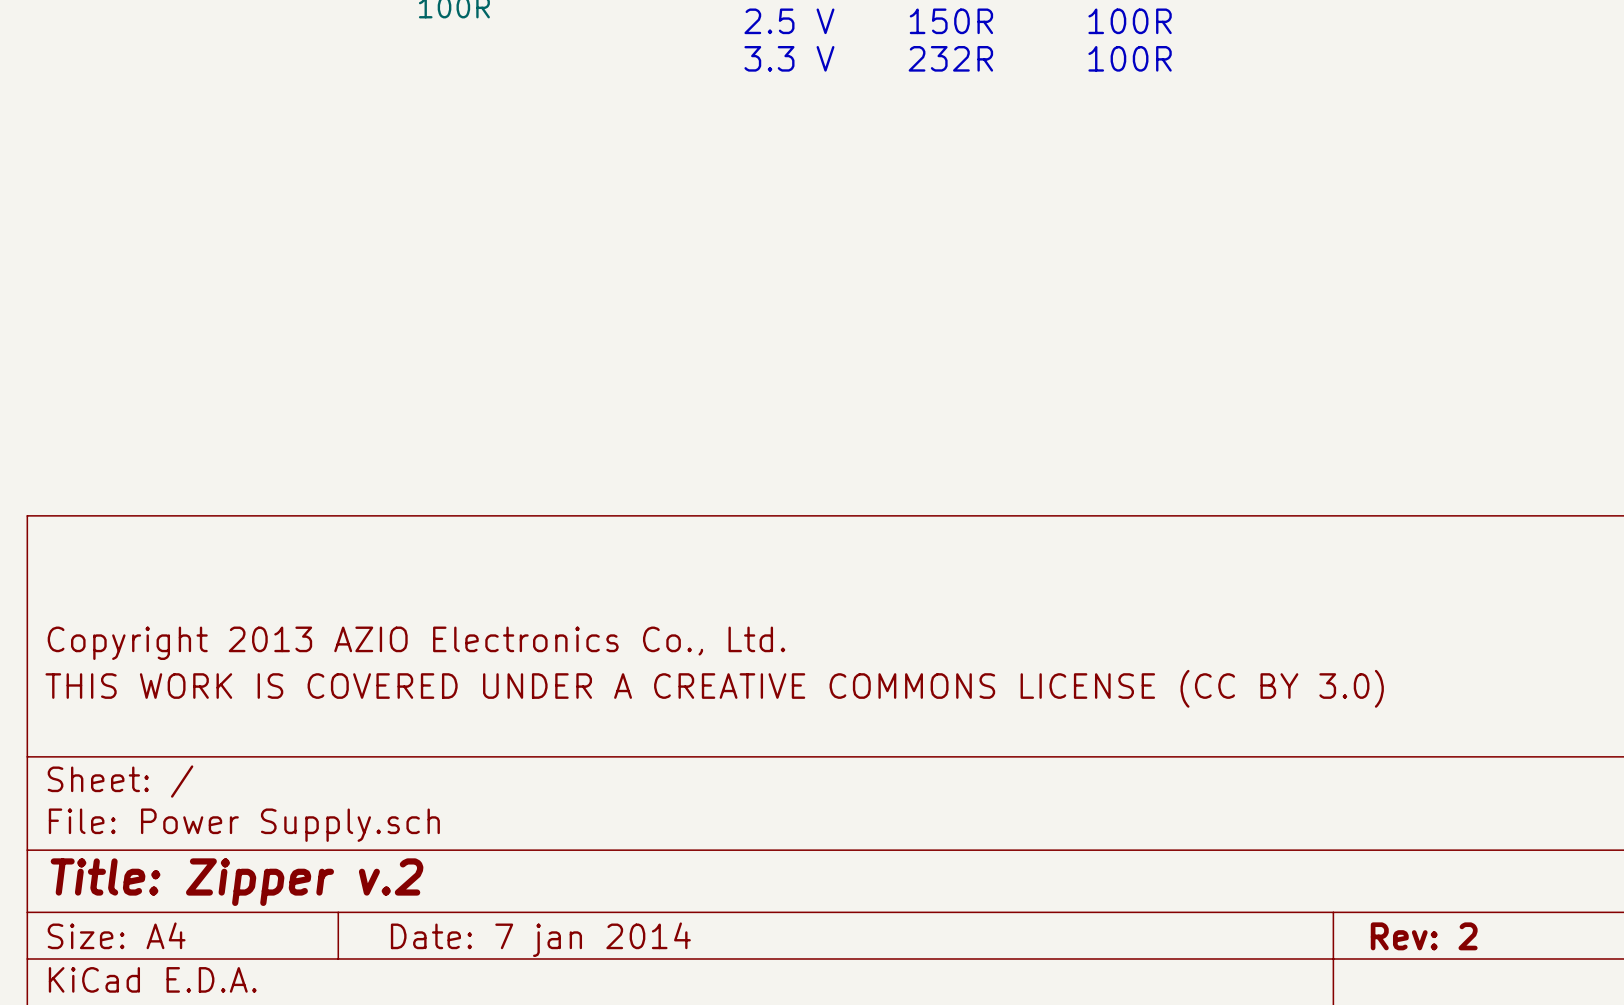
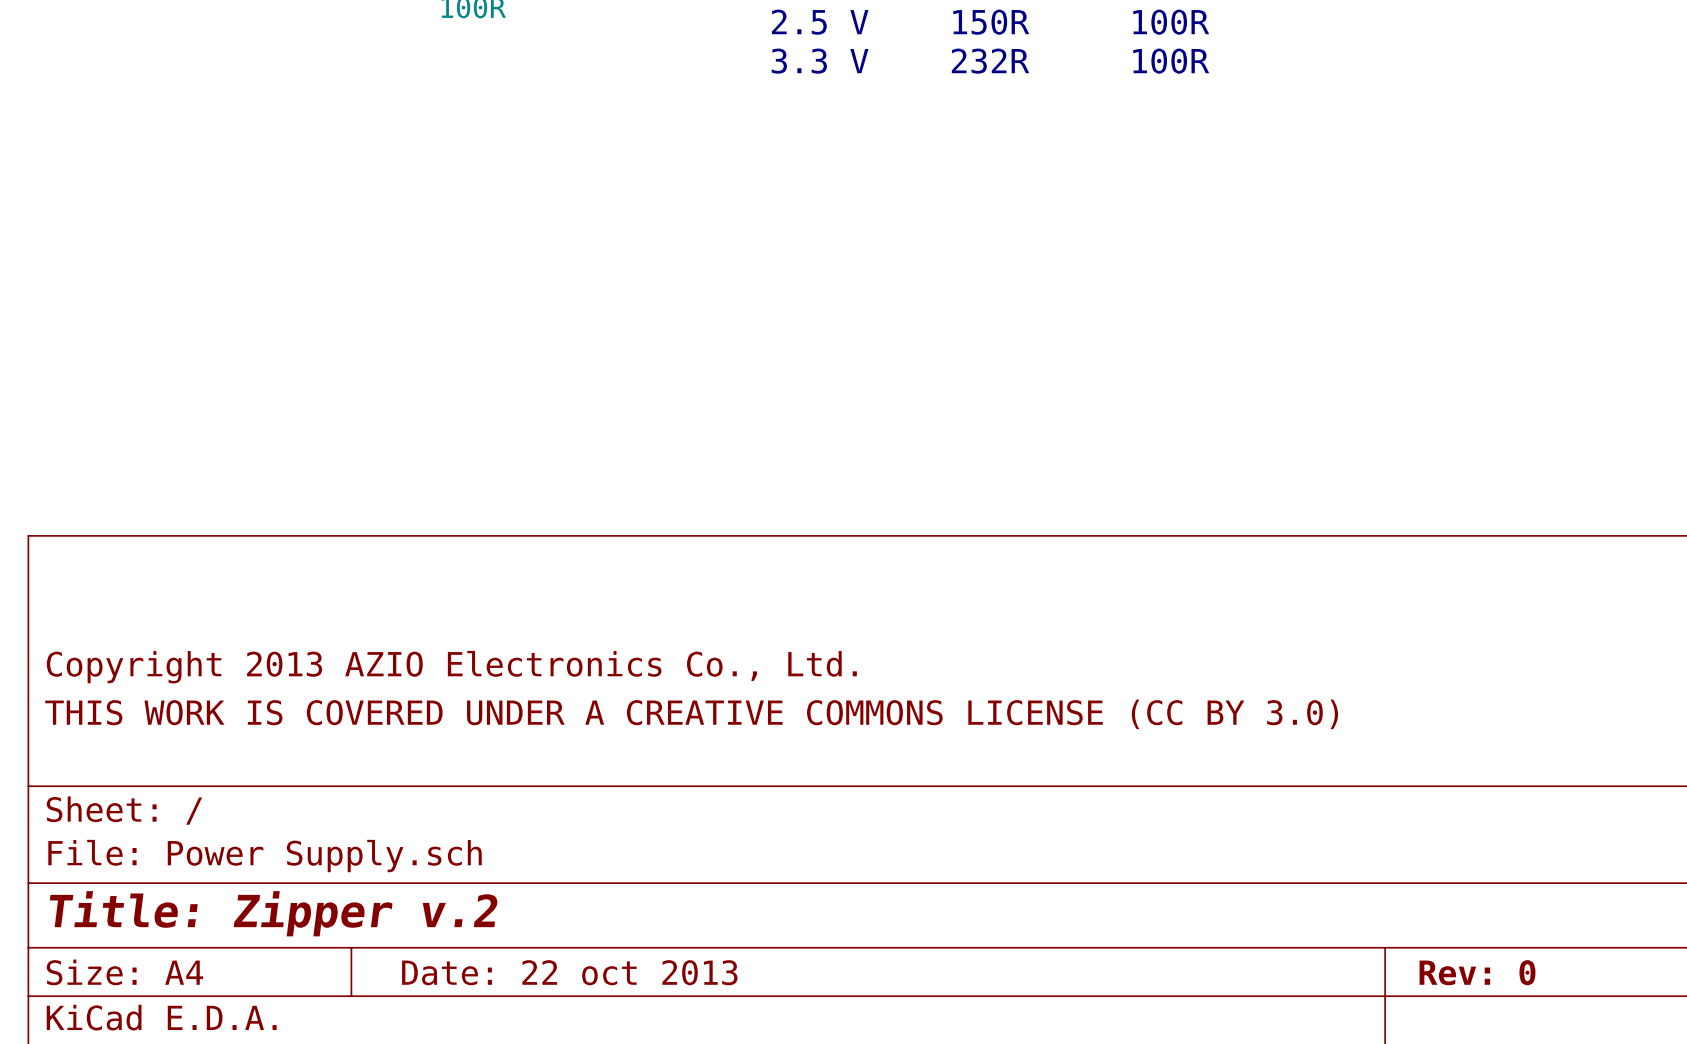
title block: Rev: 2 (1424, 936) -> Rev: 0 (1477, 972)
title block: Date: 7 jan 2014 (540, 939) -> Date: 22 oct 2013 (569, 972)

